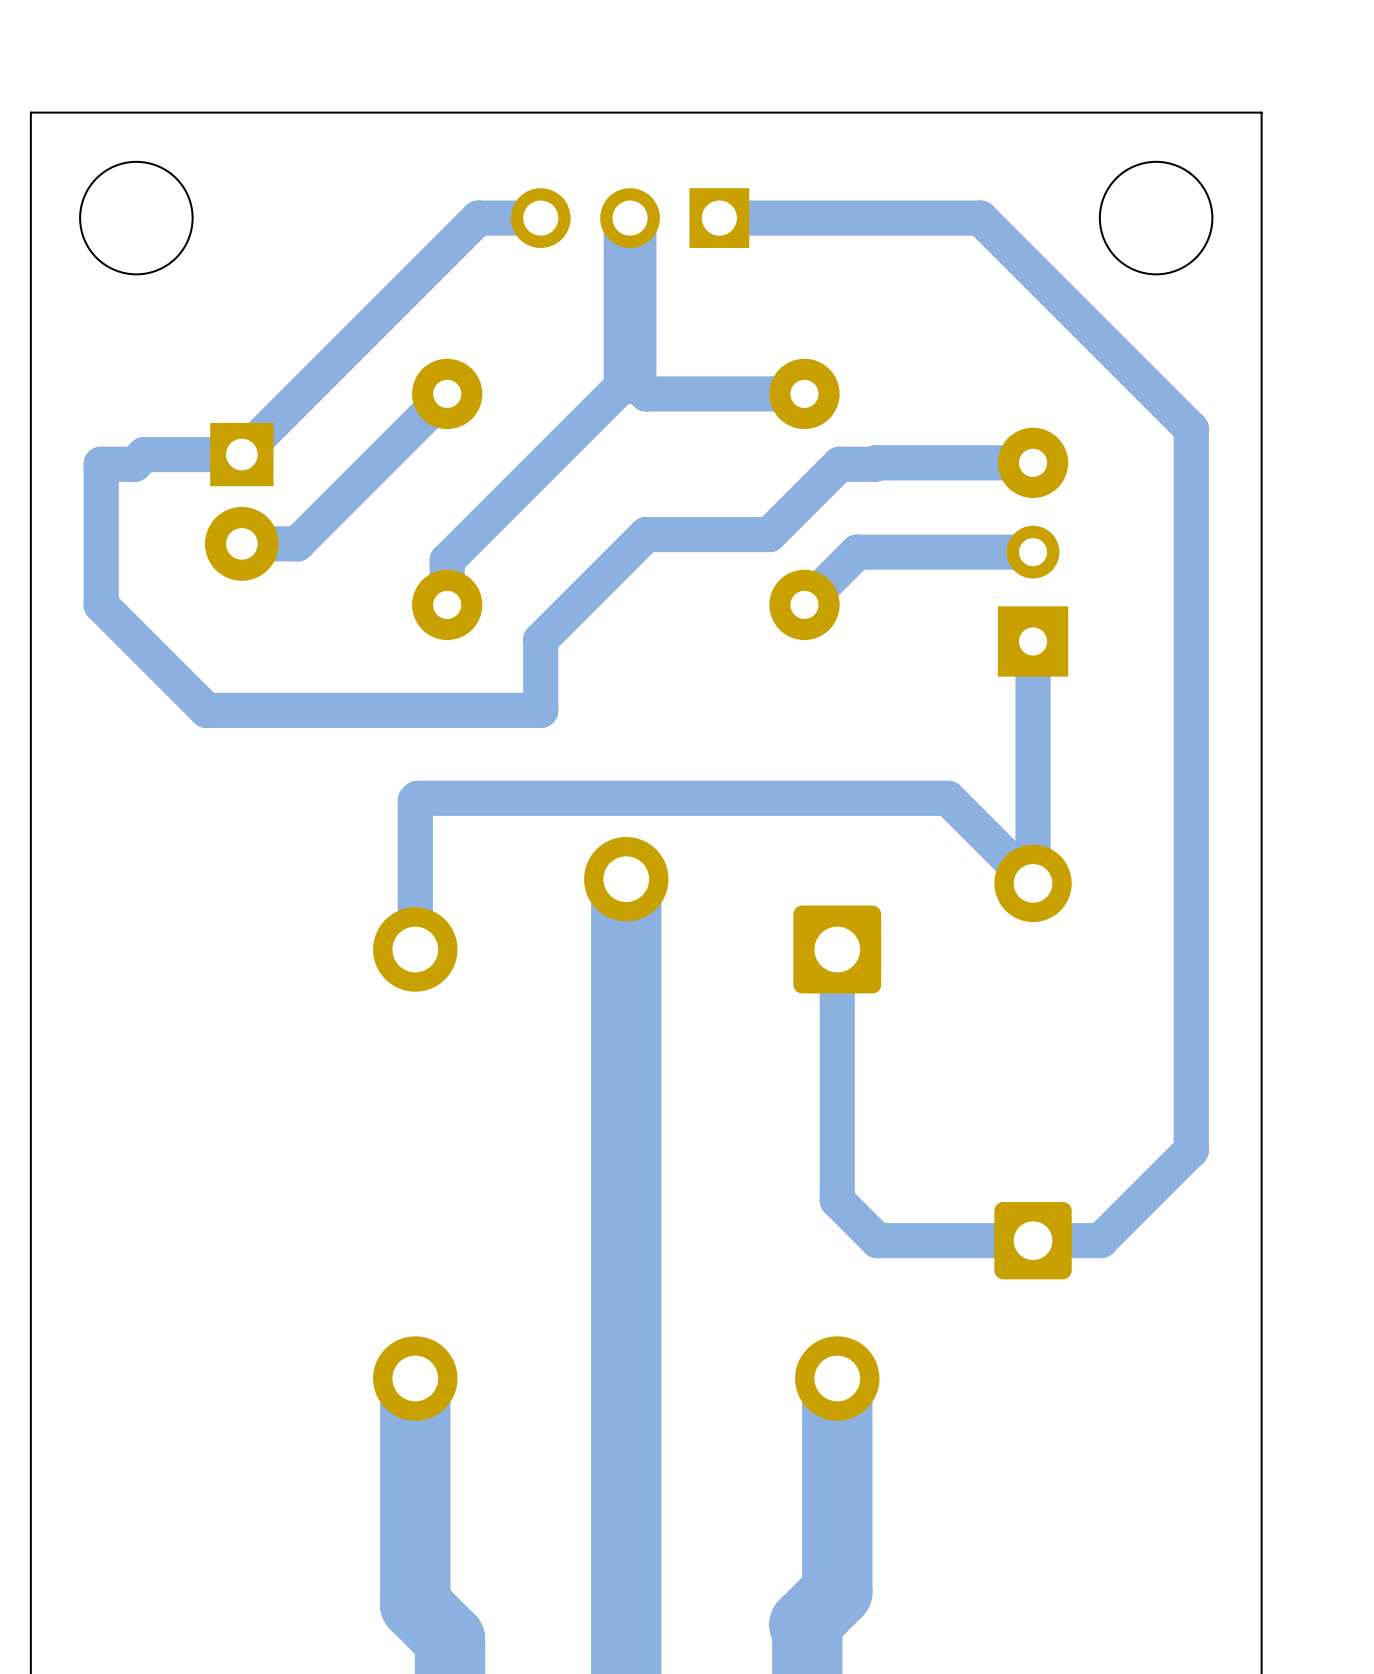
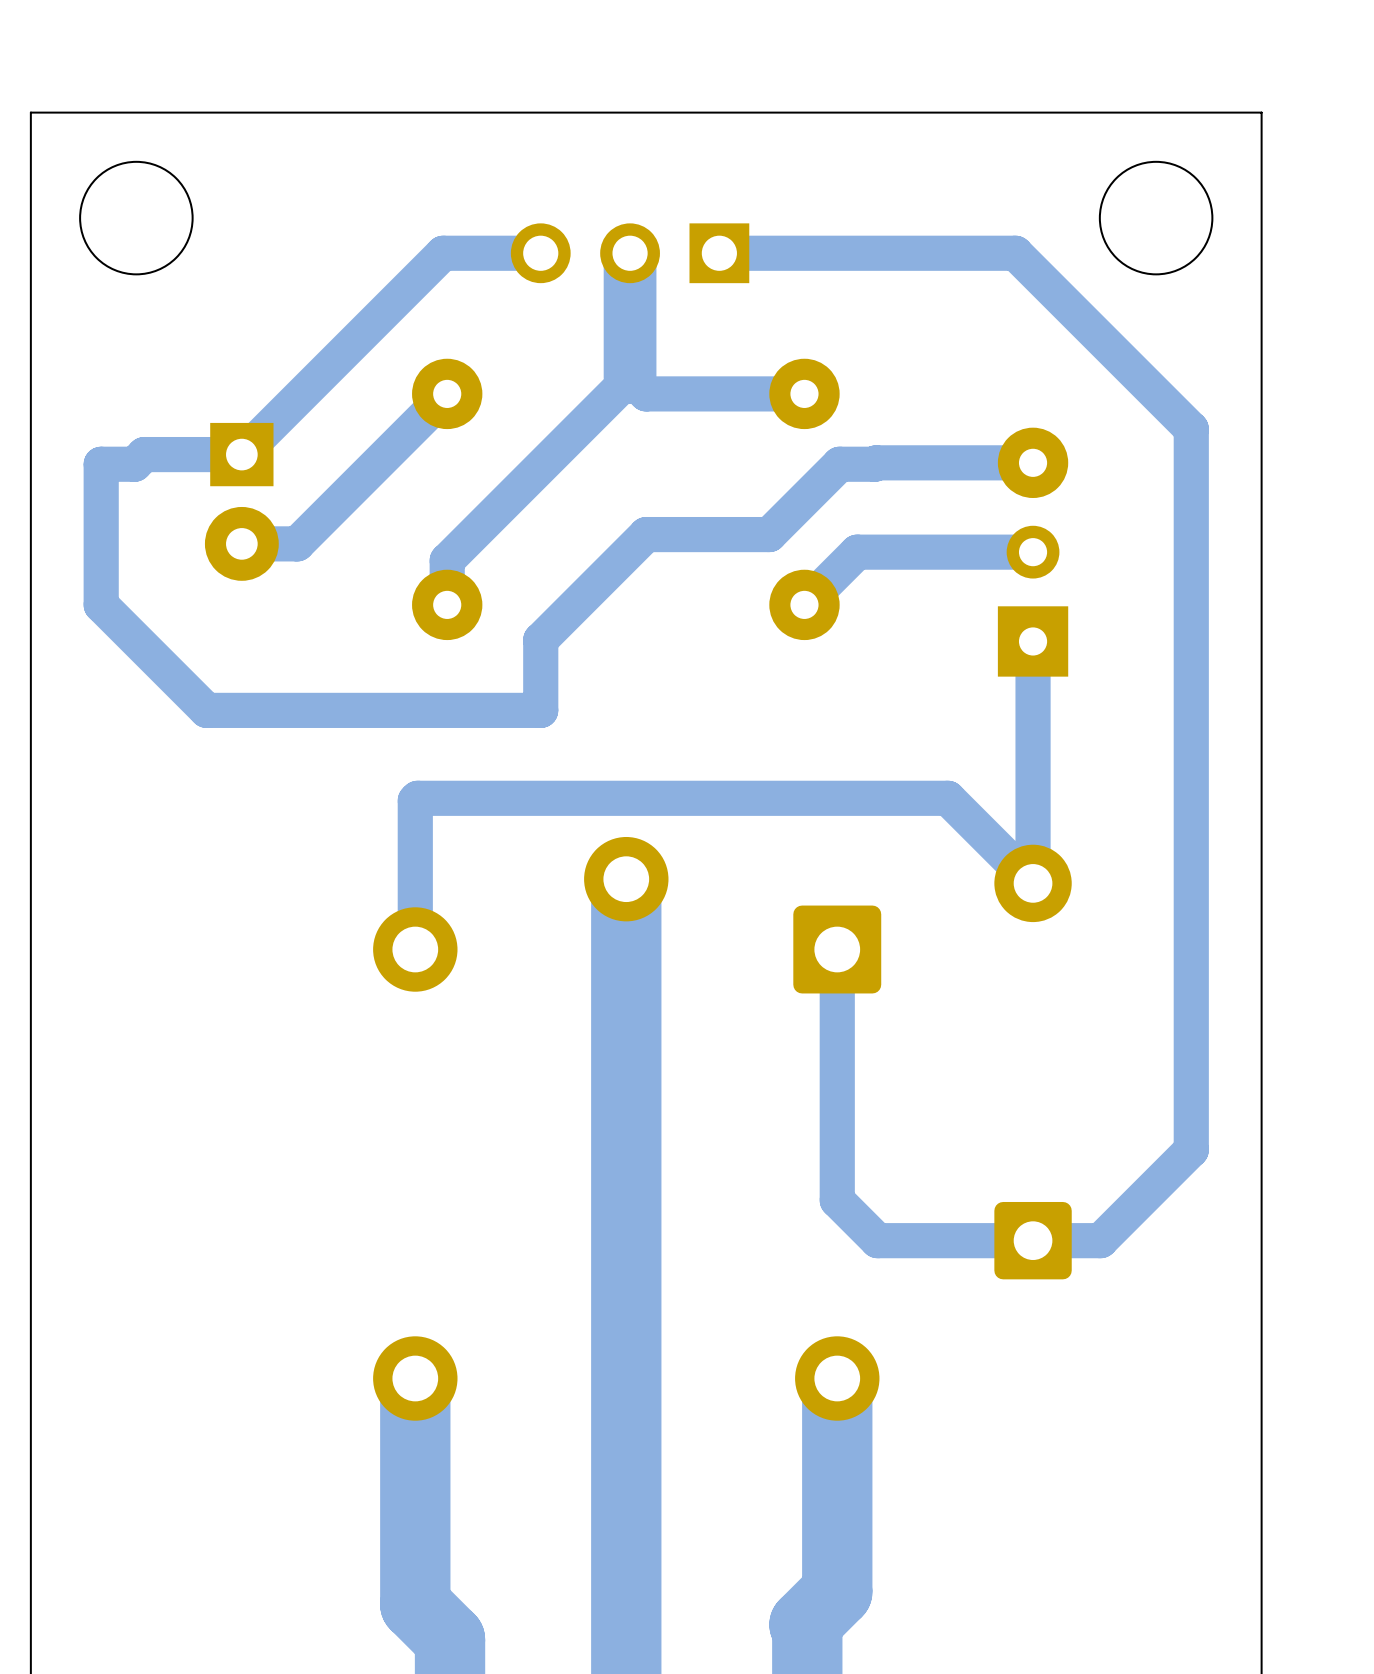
bottom track: (540, 218) (478, 218) (443, 253) -> (540, 253) (443, 253)
part position: (630, 218) -> (630, 253)
bottom track: (719, 218) (980, 218) (1015, 253) -> (719, 253) (1015, 253)

